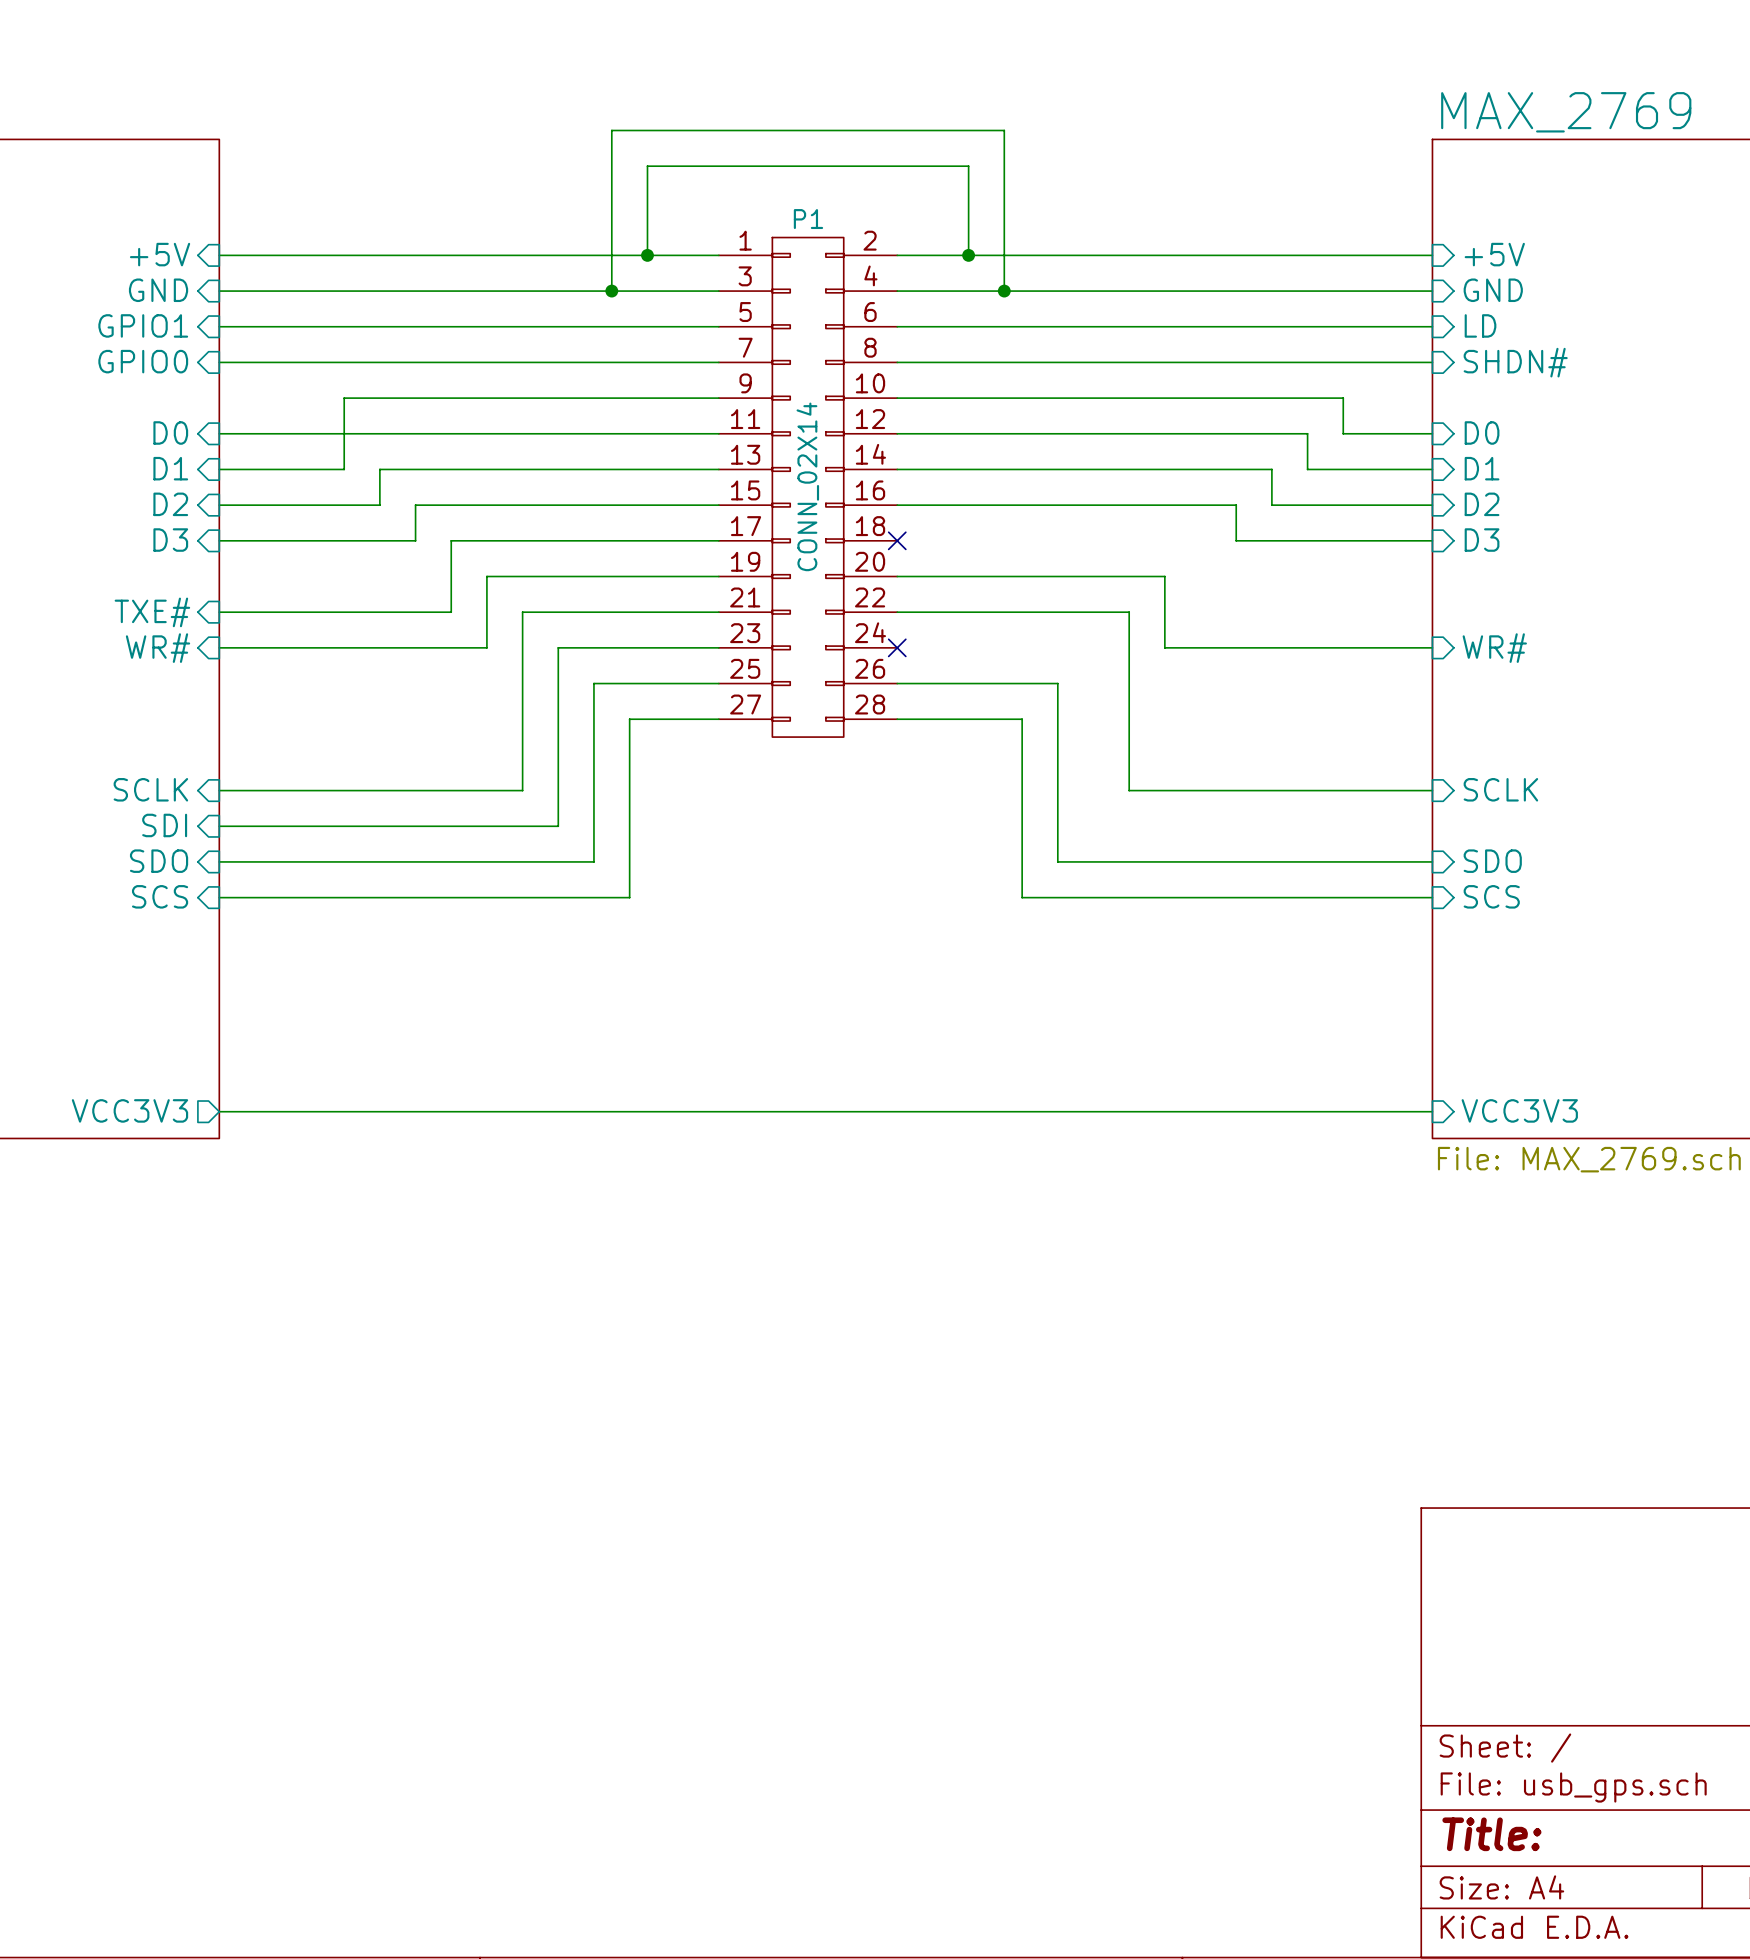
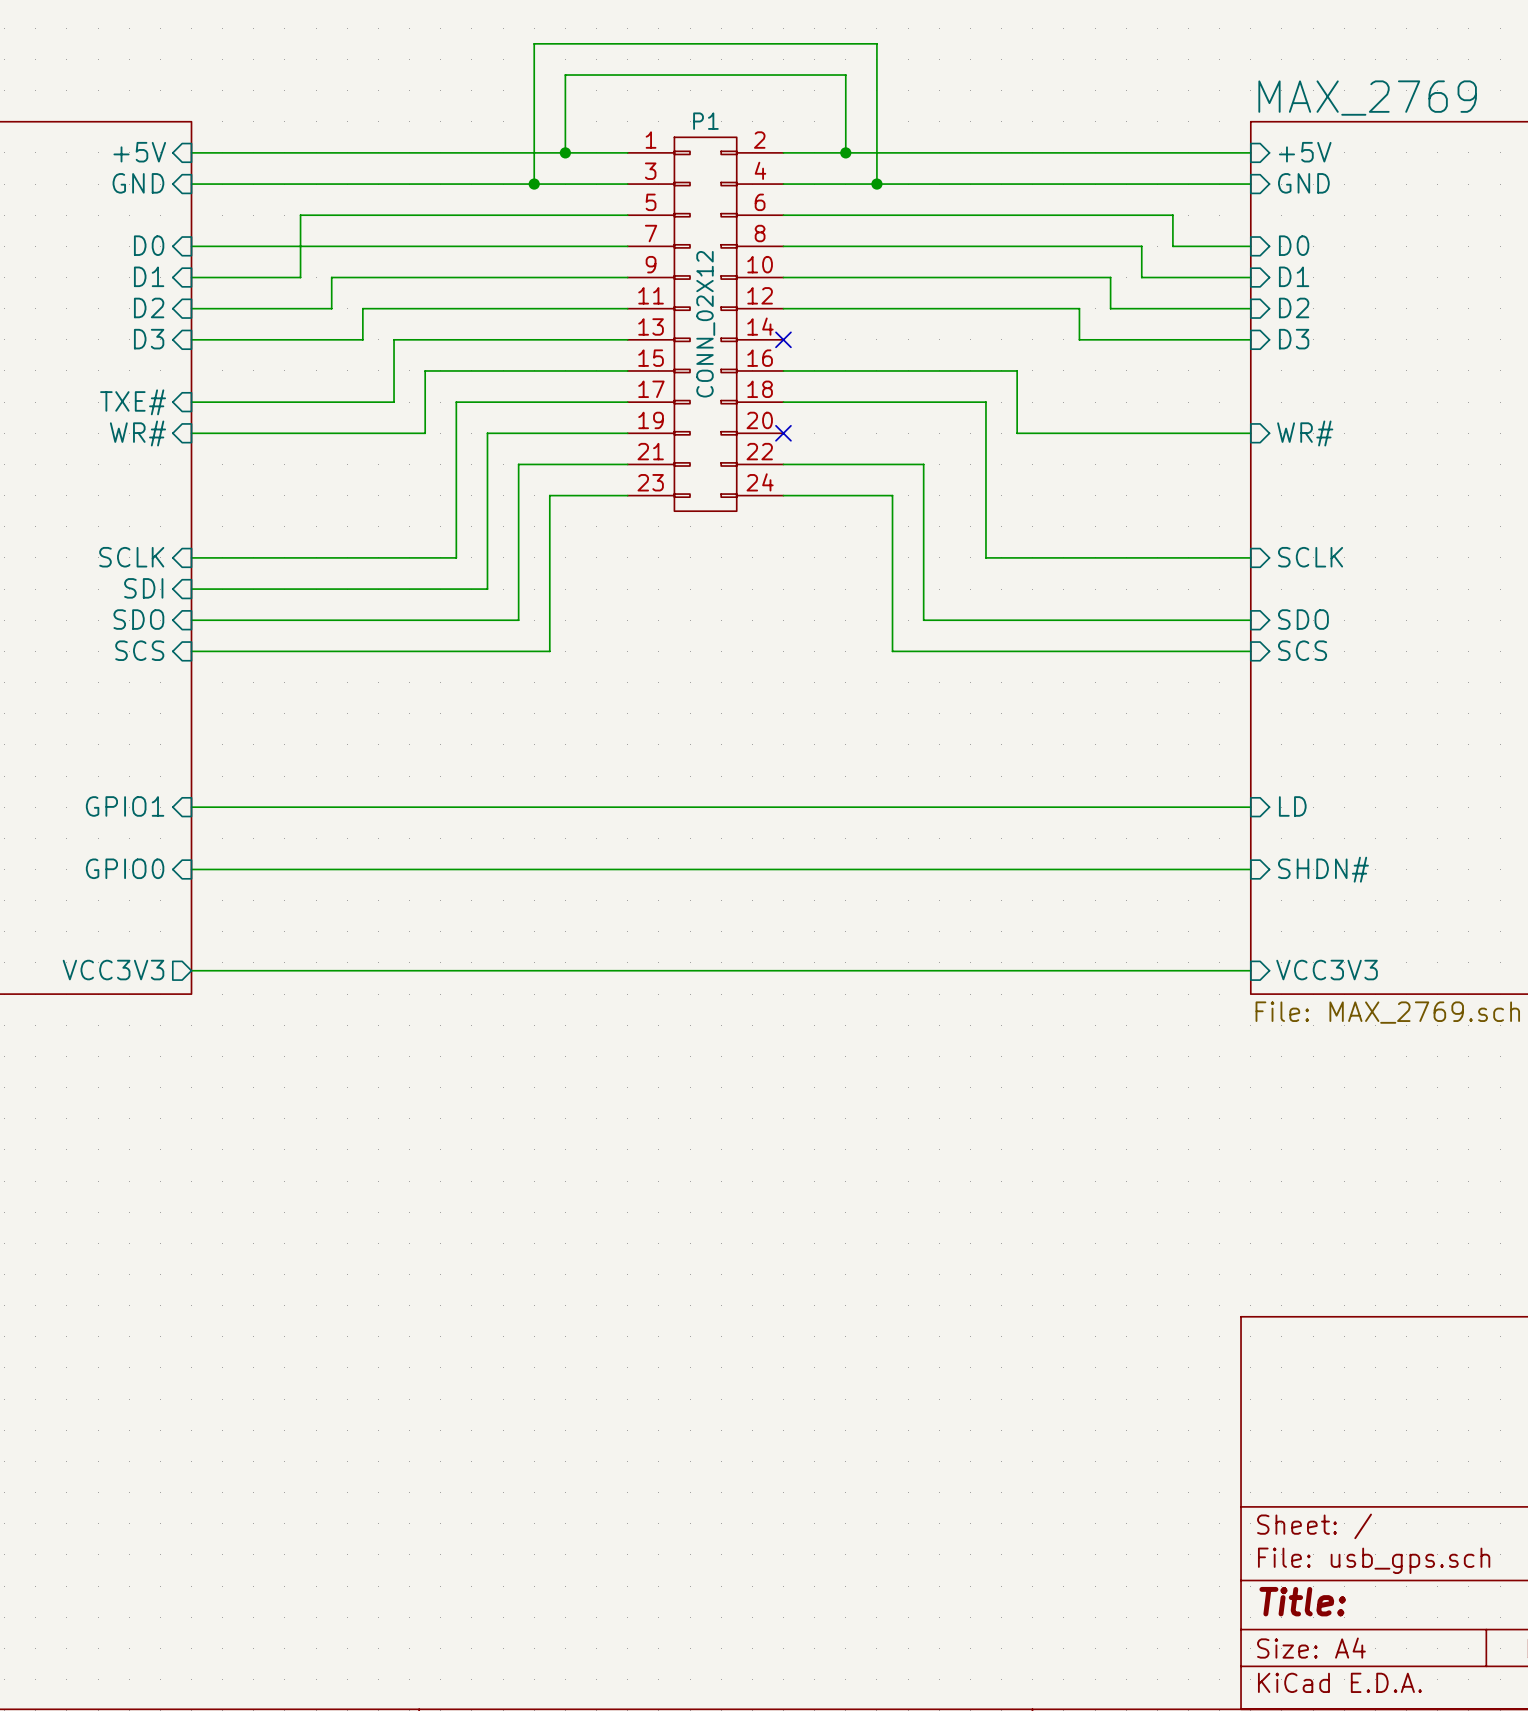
wire: (611, 130) (1004, 130) -> (534, 113) (534, 43) (876, 43) (876, 113)
wire: (647, 166) (968, 166) -> (565, 145) (565, 75) (845, 75) (845, 145)
wire: (647, 175) (647, 255) -> none
junction: none -> (565, 152)
wire: (968, 175) (968, 255) -> none
junction: none -> (845, 152)
wire: (611, 210) (611, 291) -> none
junction: none -> (534, 184)
wire: (1004, 210) (1004, 291) -> none
junction: none -> (876, 184)
P1 name position: P1 (808, 219) -> P1 (705, 121)
P1 symbol: [718, 237, 898, 738] -> [627, 137, 784, 512]
sheet pin position: +5V (160, 254) -> +5V (139, 152)
sheet pin position: +5V (1494, 254) -> +5V (1305, 152)
wire: (219, 255) (718, 255) -> none
junction: (647, 255) -> none
wire: (897, 255) (1432, 255) -> none
junction: (968, 255) -> none
sheet pin position: GND (158, 290) -> GND (138, 183)
sheet pin position: GND (1493, 290) -> GND (1303, 183)
wire: (219, 291) (718, 291) -> none
junction: (611, 291) -> none
wire: (897, 291) (1432, 291) -> none
junction: (1004, 291) -> none
sheet pin: GPIO1 (143, 325) -> none
sheet pin: LD (1480, 325) -> none
wire: (219, 326) (718, 326) -> (191, 152) (627, 152)
wire: (897, 326) (1432, 326) -> (783, 152) (1250, 152)
sheet pin: GPIO0 (143, 361) -> none
wire: (219, 362) (718, 362) -> (191, 184) (627, 184)
wire: (897, 362) (1432, 362) -> (783, 184) (1250, 184)
sheet pin: SHDN# (1515, 362) -> none
no-connect mark: none -> (783, 339)
wire: (718, 398) (344, 398) (344, 469) (219, 469) -> (627, 215) (300, 215) (300, 277) (191, 277)
wire: (897, 398) (1343, 398) (1343, 433) (1432, 433) -> (783, 215) (1172, 215) (1172, 246) (1250, 246)
sheet pin position: D0 (170, 432) -> D0 (149, 245)
sheet pin position: D0 (1482, 432) -> D0 (1294, 245)
wire: (219, 433) (718, 433) -> (191, 246) (627, 246)
wire: (897, 433) (1307, 433) (1307, 469) (1432, 469) -> (783, 246) (1141, 246) (1141, 277) (1250, 277)
sheet pin position: D1 (170, 468) -> D1 (149, 276)
sheet pin position: D1 (1482, 468) -> D1 (1294, 276)
wire: (718, 469) (379, 469) (379, 505) (219, 505) -> (627, 277) (331, 277) (331, 308) (191, 308)
wire: (897, 469) (1271, 469) (1271, 505) (1432, 505) -> (783, 277) (1110, 277) (1110, 308) (1250, 308)
P1 value: CONN_02X14 (807, 486) -> CONN_02X12 (705, 324)
sheet pin position: D2 (170, 504) -> D2 (149, 307)
sheet pin position: D2 (1482, 504) -> D2 (1294, 307)
wire: (718, 505) (415, 505) (415, 540) (219, 540) -> (627, 308) (362, 308) (362, 339) (191, 339)
wire: (897, 505) (1236, 505) (1236, 540) (1432, 540) -> (783, 308) (1079, 308) (1079, 339) (1250, 339)
sheet pin position: D3 (170, 540) -> D3 (149, 339)
wire: (718, 540) (451, 540) (451, 612) (219, 612) -> (627, 339) (394, 339) (394, 402) (191, 402)
no-connect mark position: (897, 540) -> (783, 433)
sheet pin position: D3 (1482, 540) -> D3 (1294, 339)
wire: (718, 576) (486, 576) (486, 647) (219, 647) -> (627, 370) (425, 370) (425, 433) (191, 433)
wire: (897, 576) (1164, 576) (1164, 647) (1432, 647) -> (783, 370) (1017, 370) (1017, 433) (1250, 433)
sheet pin position: TXE# (152, 612) -> TXE# (133, 402)
wire: (522, 612) (718, 612) -> (456, 534) (456, 402) (627, 402)
wire: (897, 612) (1129, 612) -> (783, 402) (985, 402) (985, 534)
wire: (522, 638) (522, 790) (219, 790) -> (456, 557) (191, 557)
wire: (1129, 638) (1129, 790) (1432, 790) -> (985, 557) (1250, 557)
wire: (558, 647) (718, 647) -> (487, 565) (487, 433) (627, 433)
no-connect mark: (897, 647) -> none
sheet pin position: WR# (158, 648) -> WR# (137, 433)
sheet pin position: WR# (1494, 648) -> WR# (1305, 433)
wire: (558, 674) (558, 826) (219, 826) -> (487, 589) (191, 589)
wire: (593, 683) (718, 683) -> (518, 596) (518, 464) (627, 464)
wire: (897, 683) (1057, 683) -> (783, 464) (923, 464) (923, 596)
wire: (593, 710) (593, 861) (219, 861) -> (518, 620) (191, 620)
wire: (1057, 710) (1057, 861) (1432, 861) -> (923, 620) (1250, 620)
wire: (629, 719) (718, 719) -> (549, 628) (549, 495) (627, 495)
wire: (897, 719) (1022, 719) -> (783, 495) (892, 495) (892, 628)
wire: (629, 745) (629, 897) (219, 897) -> (549, 651) (191, 651)
wire: (1022, 745) (1022, 897) (1432, 897) -> (892, 651) (1250, 651)
sheet pin position: SCLK (150, 789) -> SCLK (131, 557)
sheet pin position: SCLK (1500, 789) -> SCLK (1310, 557)
sheet pin position: SDI (164, 825) -> SDI (143, 588)
sheet pin position: SDO (159, 861) -> SDO (138, 619)
sheet pin position: SDO (1492, 861) -> SDO (1303, 619)
sheet pin position: SCS (160, 896) -> SCS (139, 650)
sheet pin position: SCS (1491, 896) -> SCS (1302, 650)
sheet pin: none -> GPIO1 (125, 806)
sheet pin: none -> LD (1292, 806)
wire: none -> (191, 807) (1250, 807)
sheet pin: none -> GPIO0 (125, 868)
wire: none -> (191, 869) (1250, 869)
sheet pin: none -> SHDN# (1323, 869)

